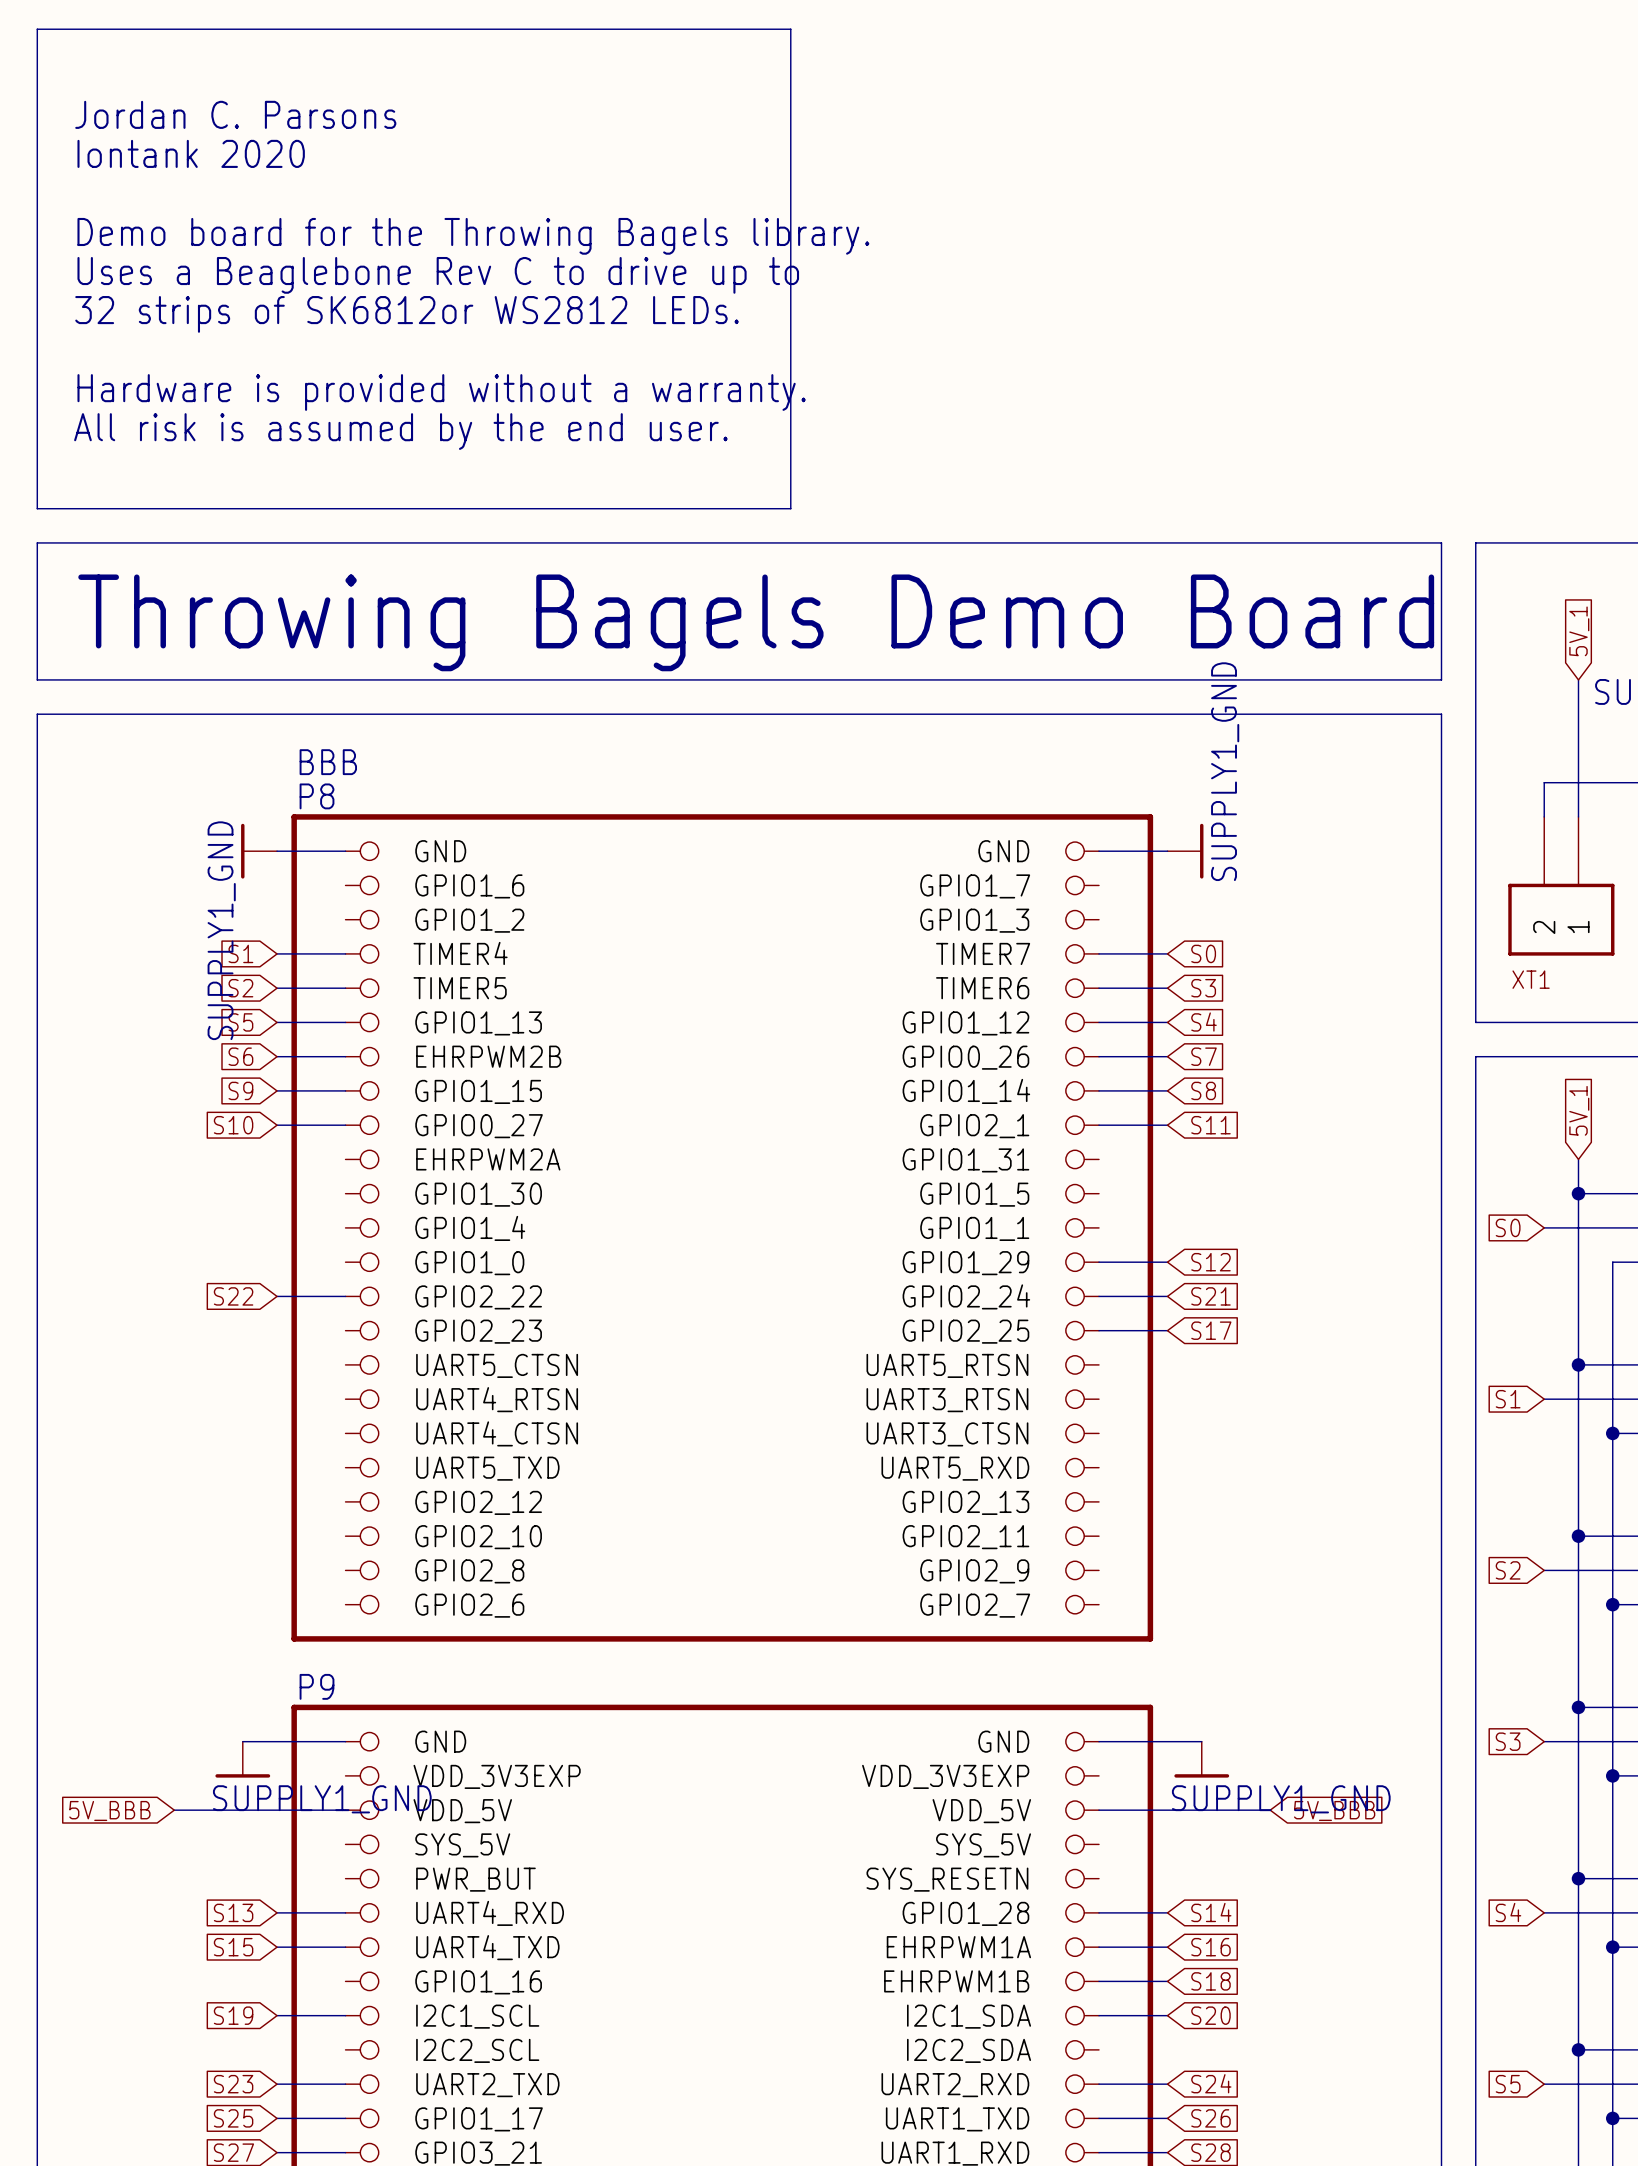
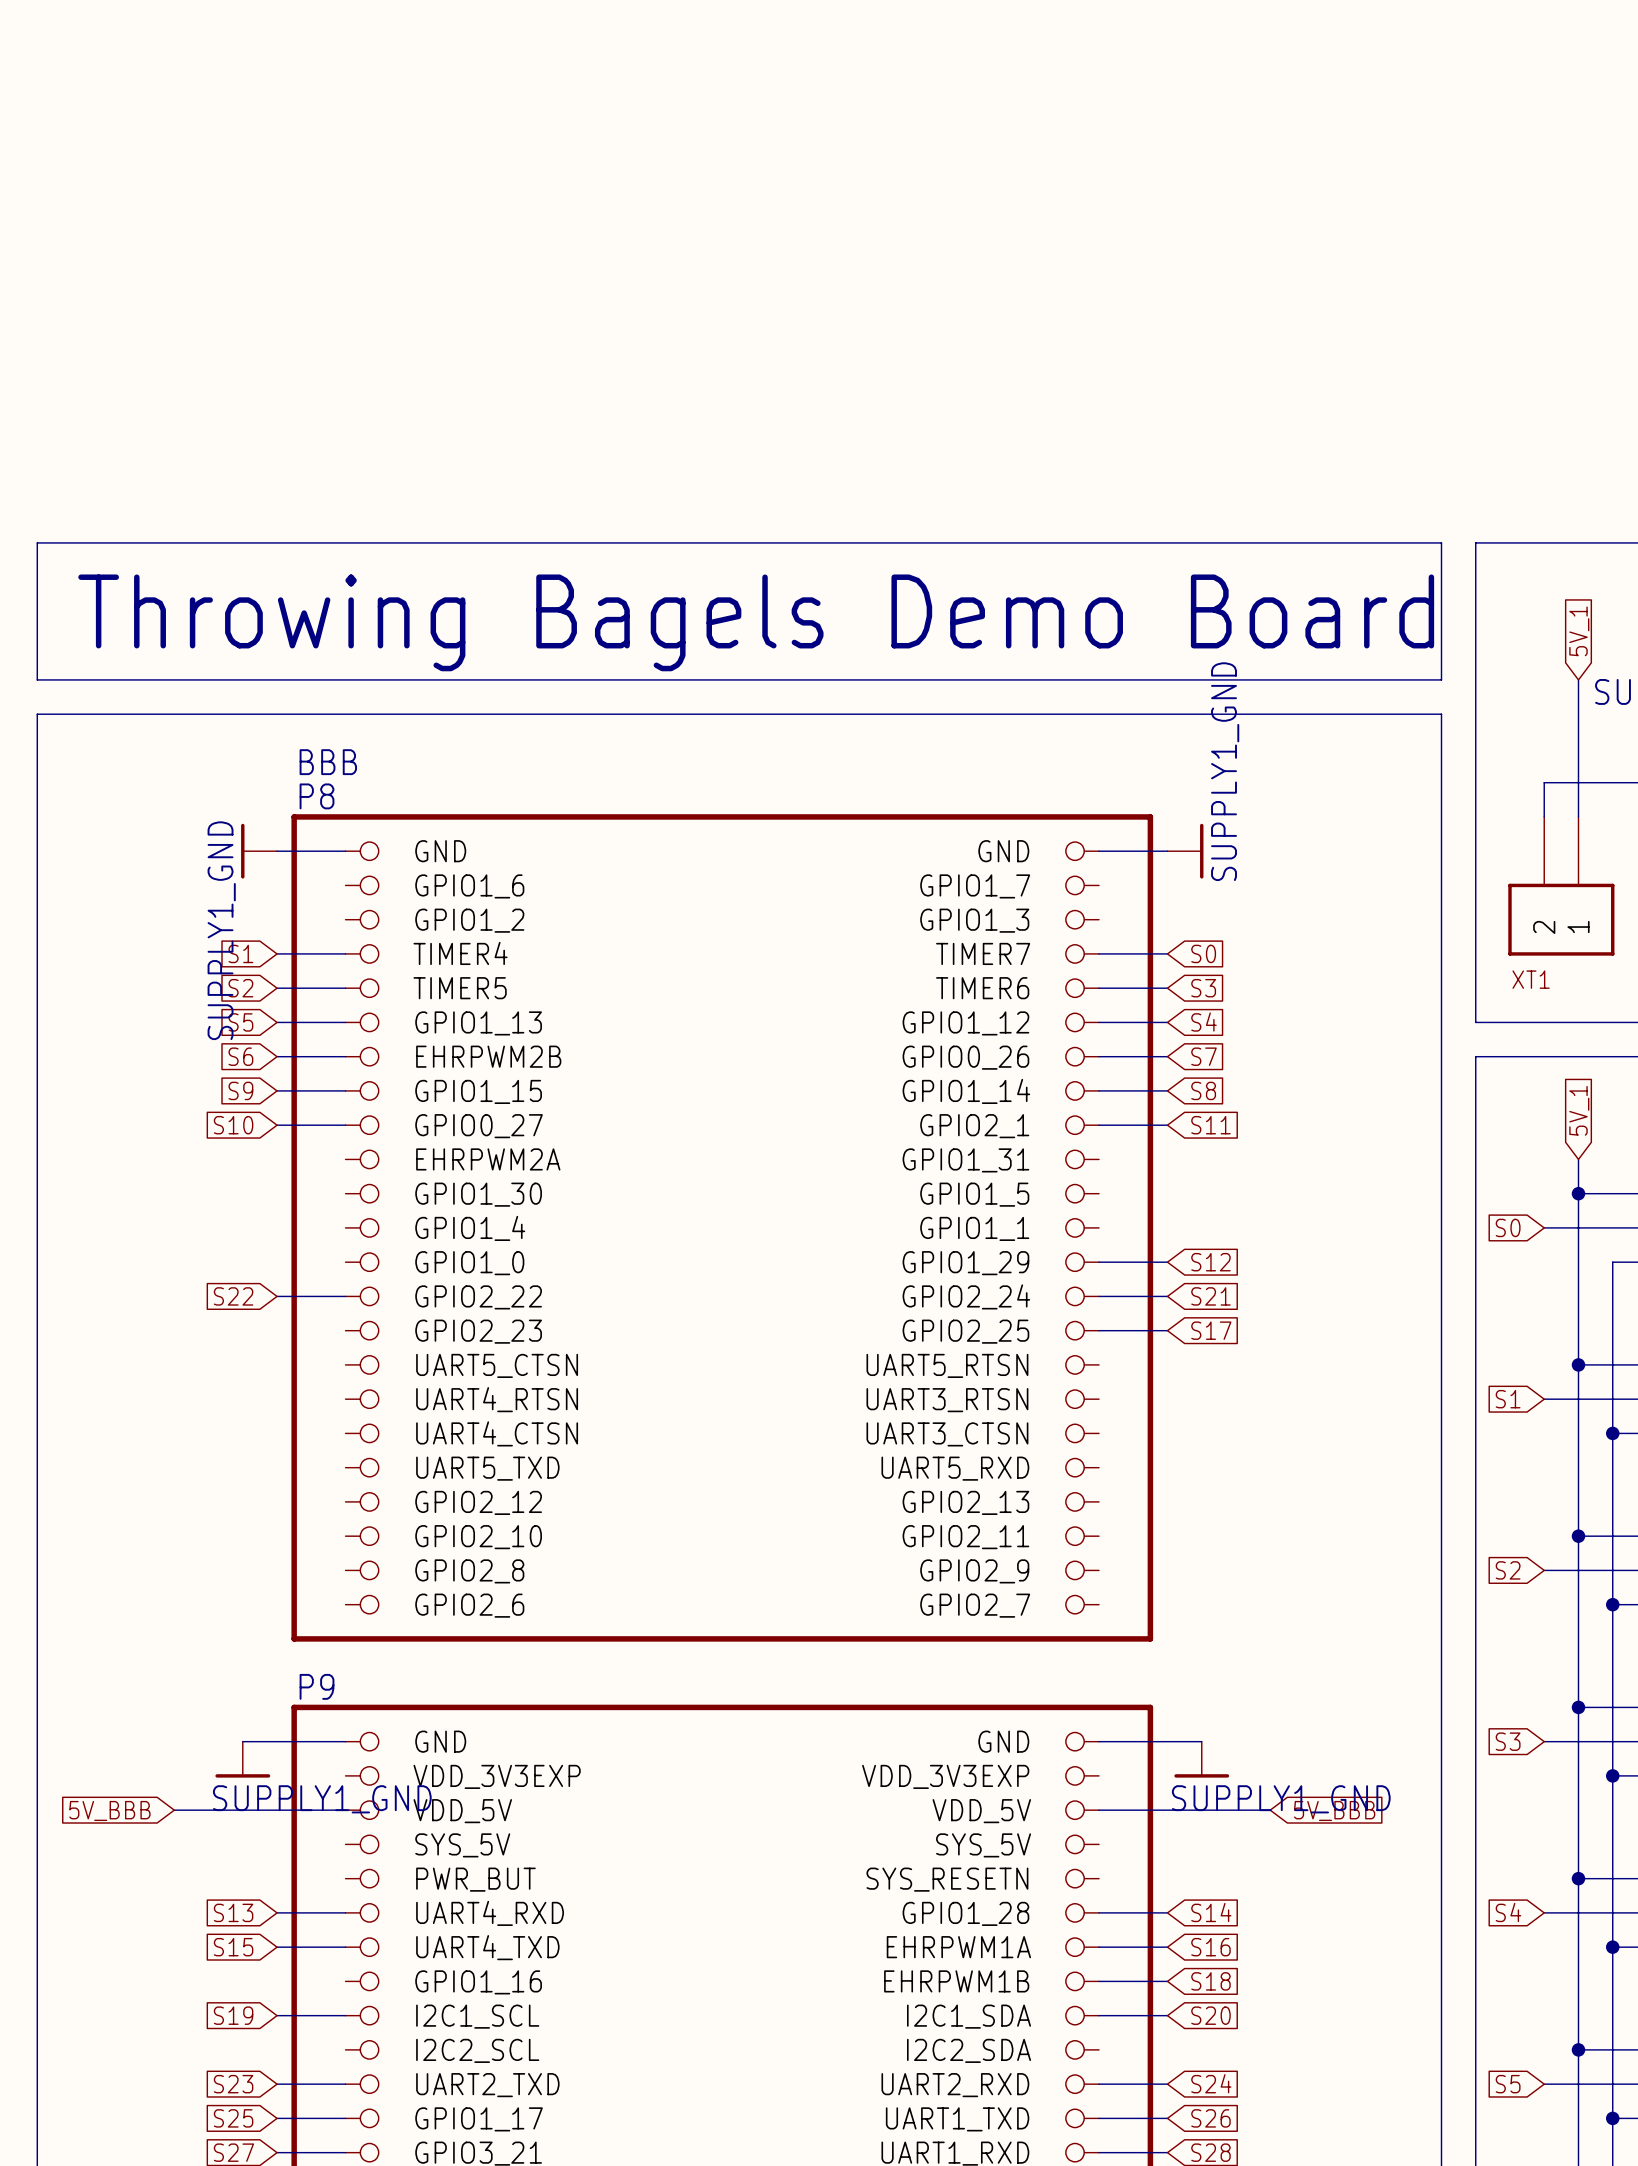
wire: (37, 29) (790, 29) (790, 508) (37, 508) (37, 29) -> none
text: Jordan C. Parsons (235, 114) -> none
text: Iontank 2020 (191, 153) -> none
text: Demo board for the Throwing Bagels library. (473, 236) -> none
text: Uses a Beaglebone Rev C to drive up to (438, 275) -> none
text: 32 strips of SK6812or WS2812 LEDs. (407, 314) -> none
text: Hardware is provided without a warranty. (441, 392) -> none
text: All risk is assumed by the end user. (400, 431) -> none

